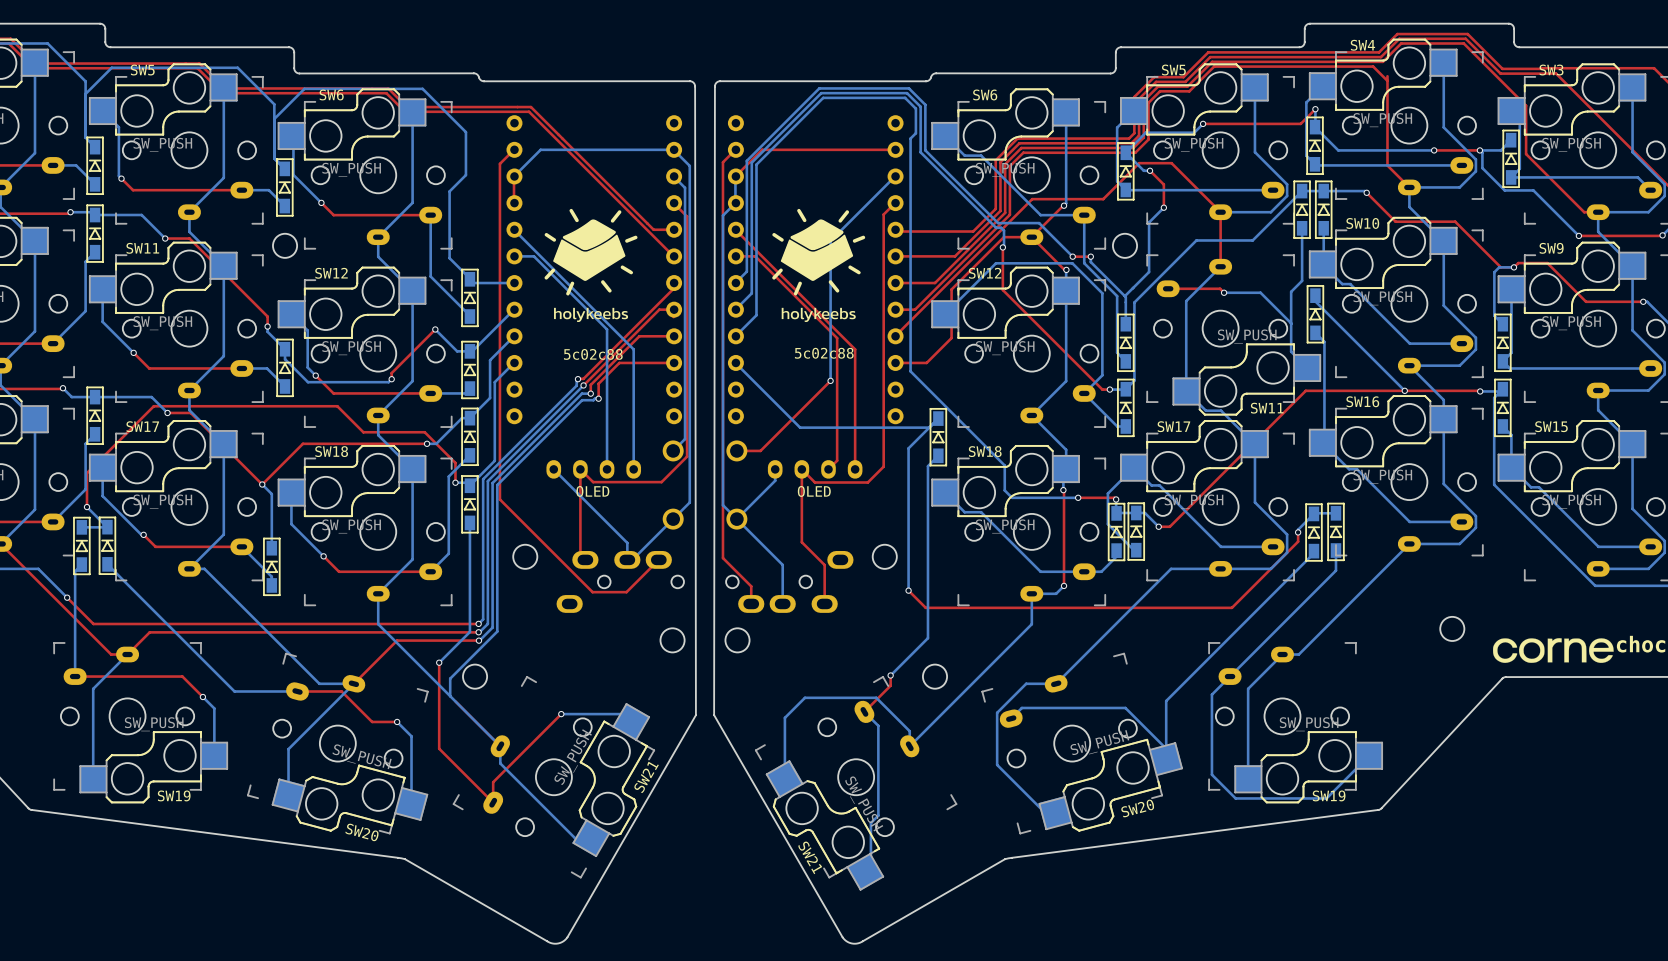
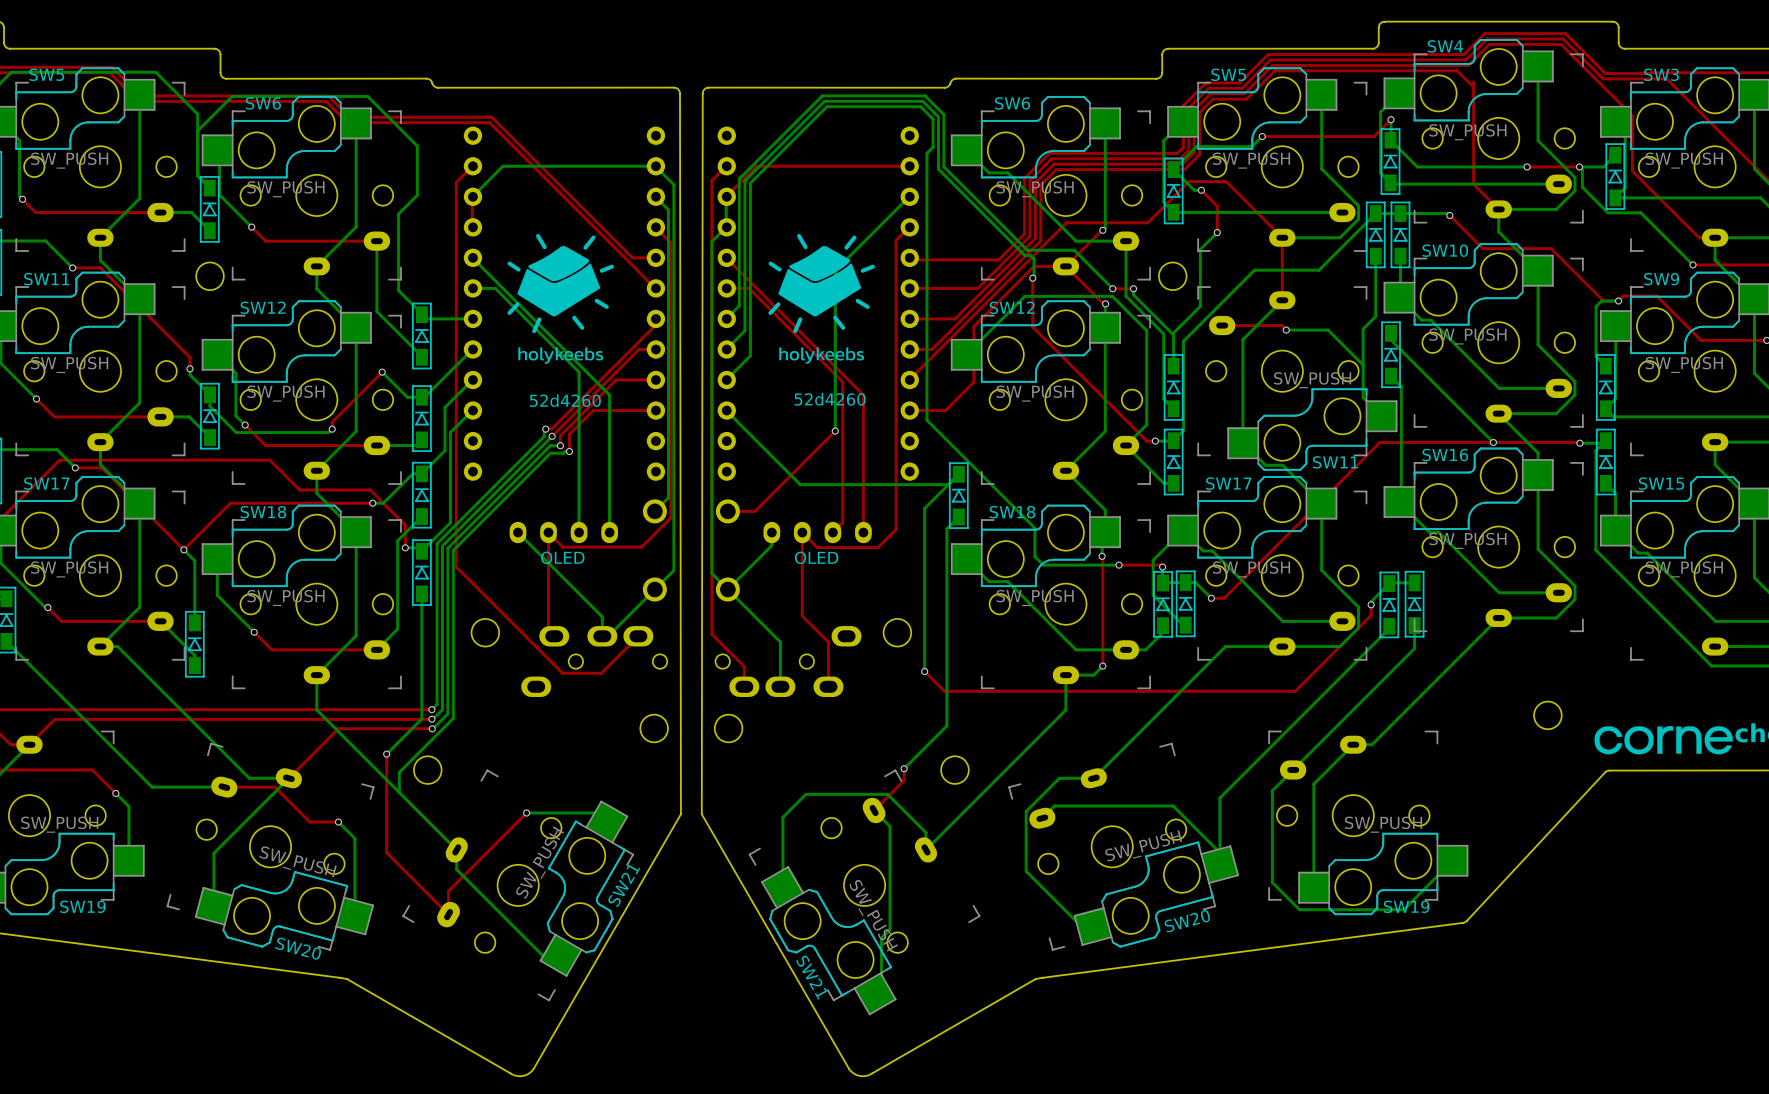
text: 5c02c88 (824, 353) -> 52d4260 (830, 399)
text: 5c02c88 (593, 354) -> 52d4260 (565, 400)

